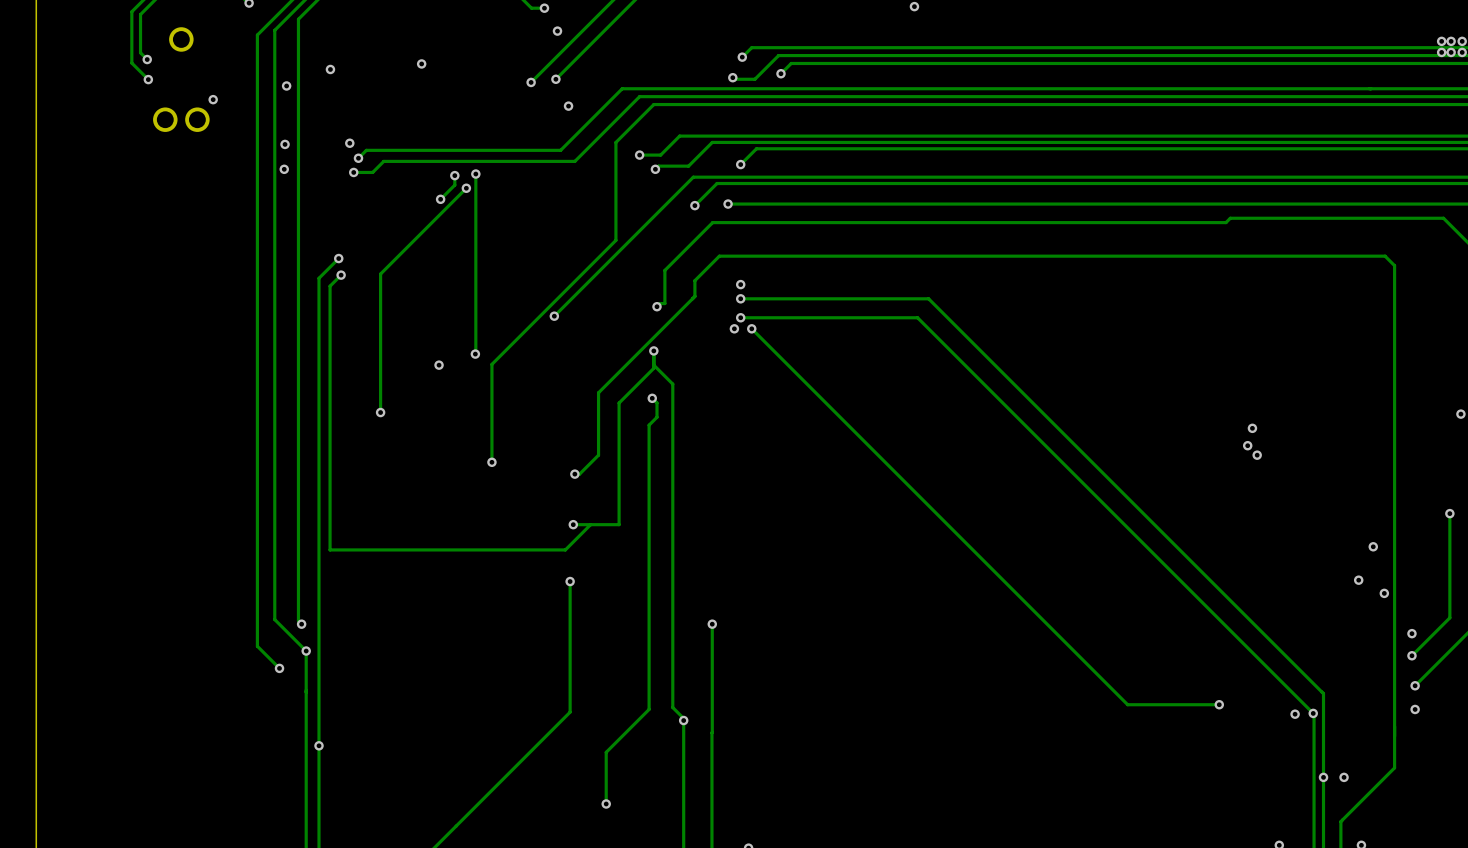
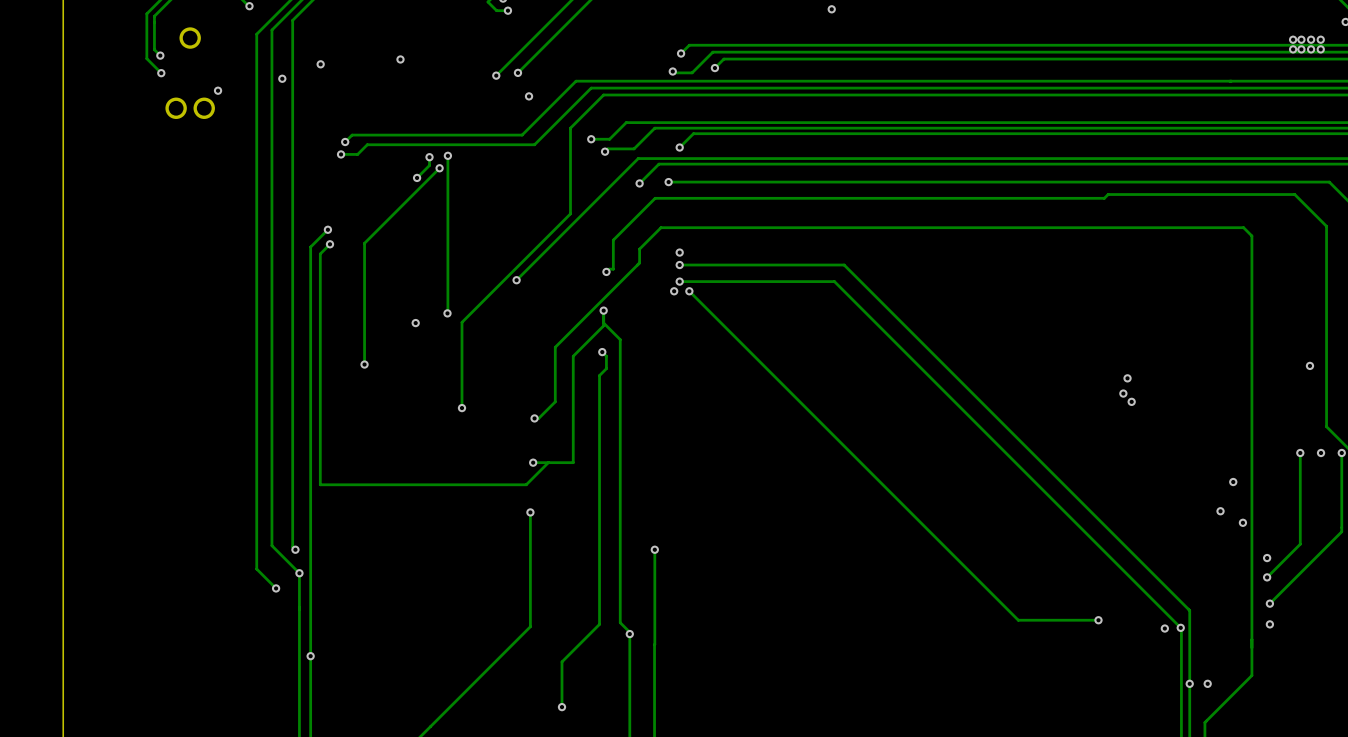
via: (557, 31) -> none
via: (349, 143) -> none
via: (285, 144) -> none
via: (284, 169) -> none

